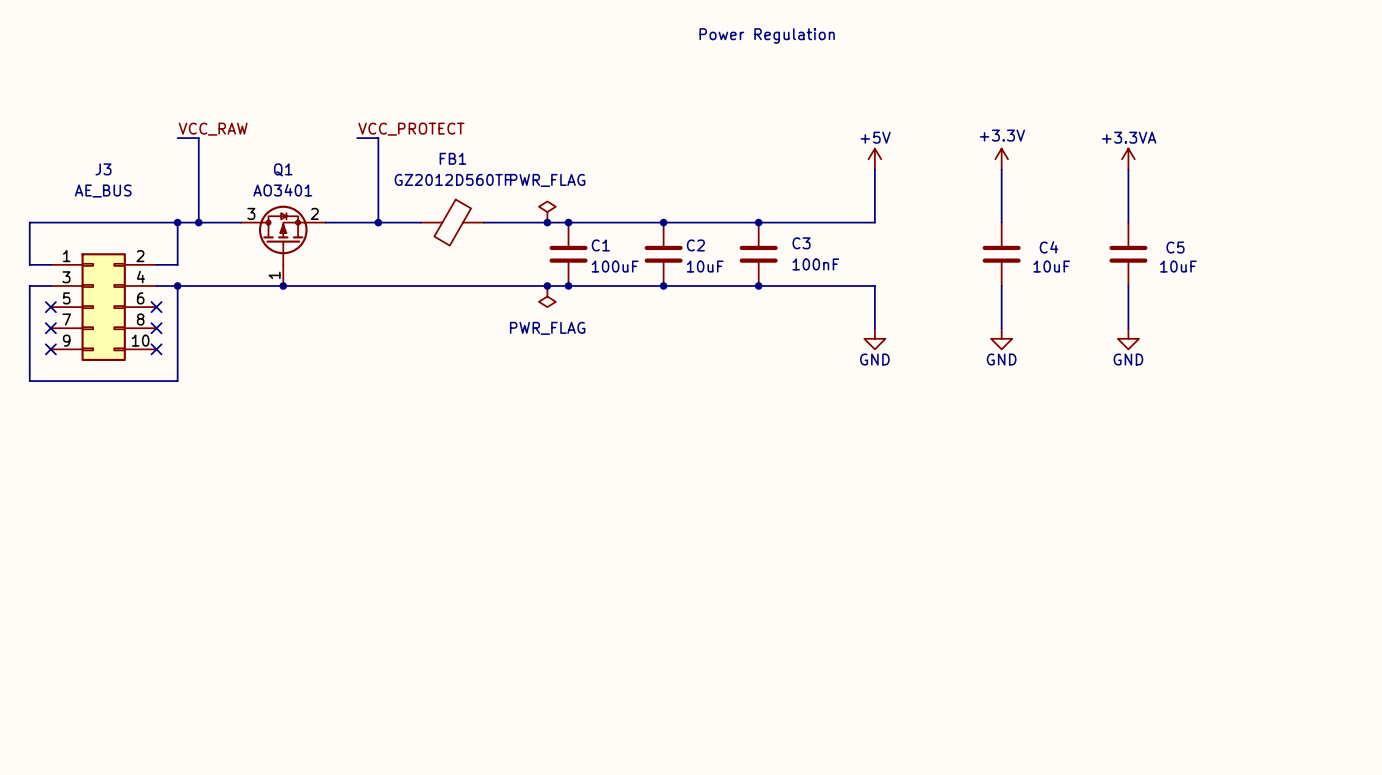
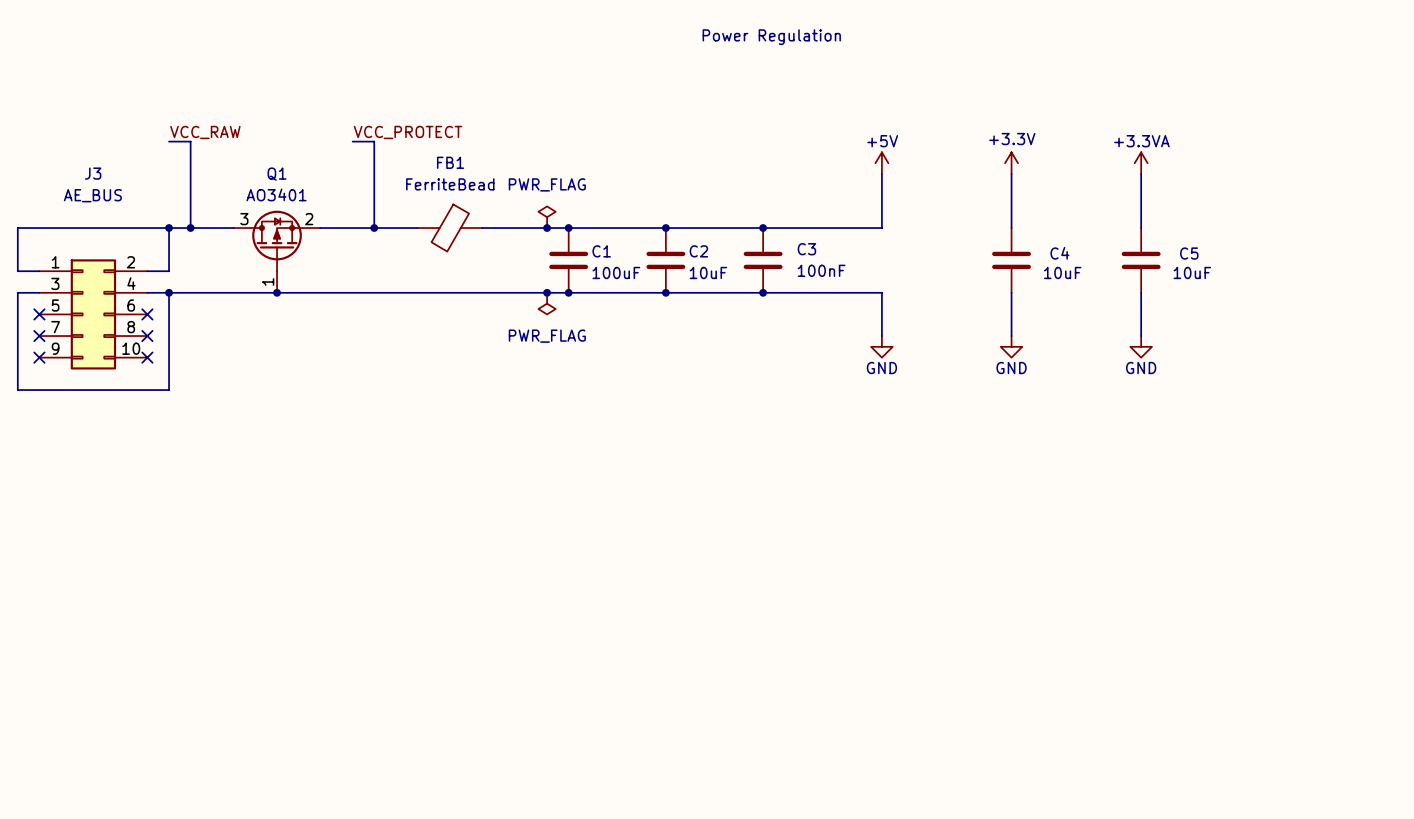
FB1 value: GZ2012D560TF (452, 179) -> FerriteBead (450, 184)

